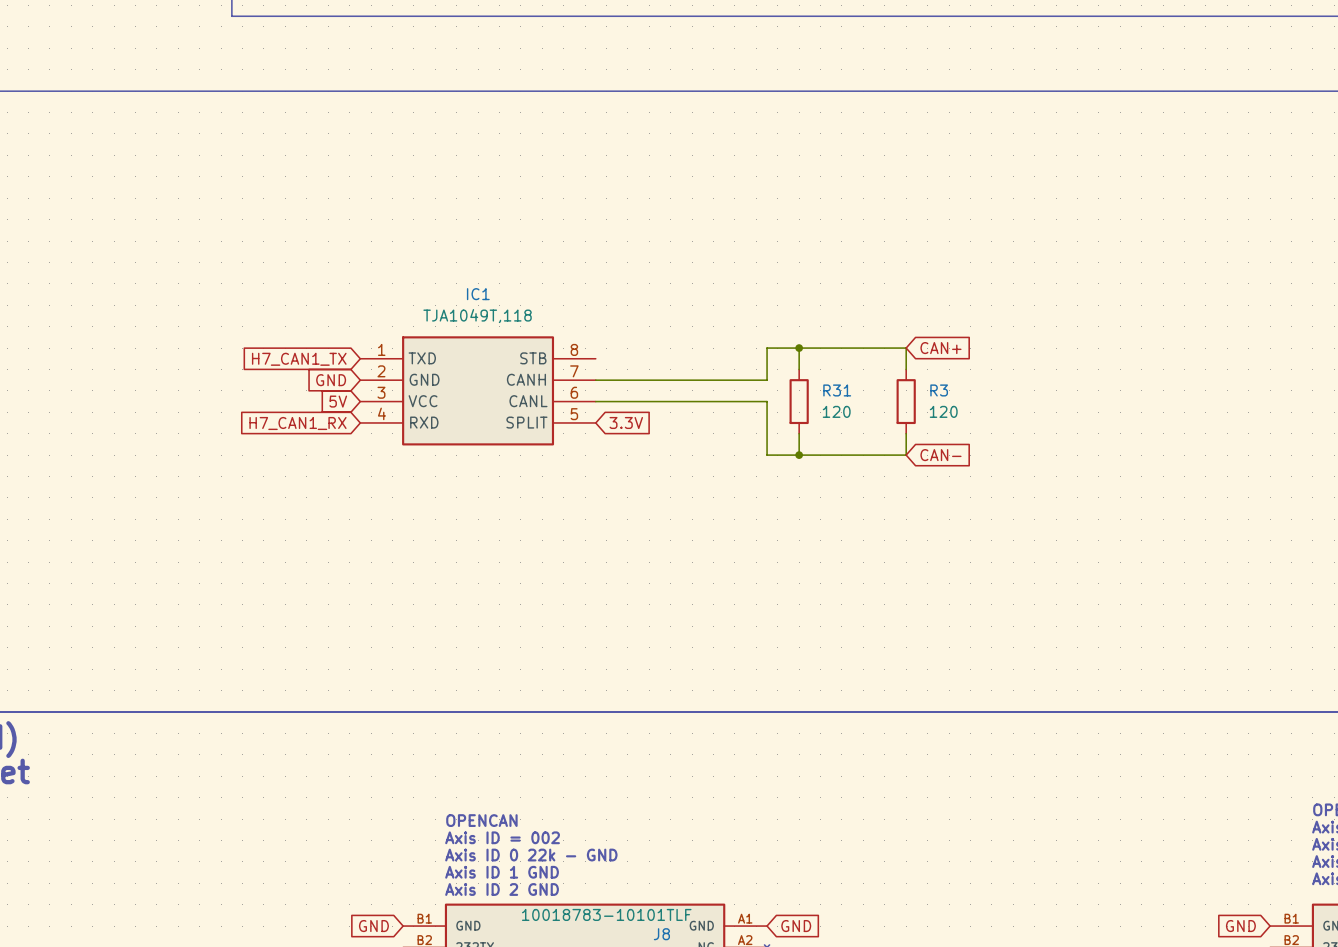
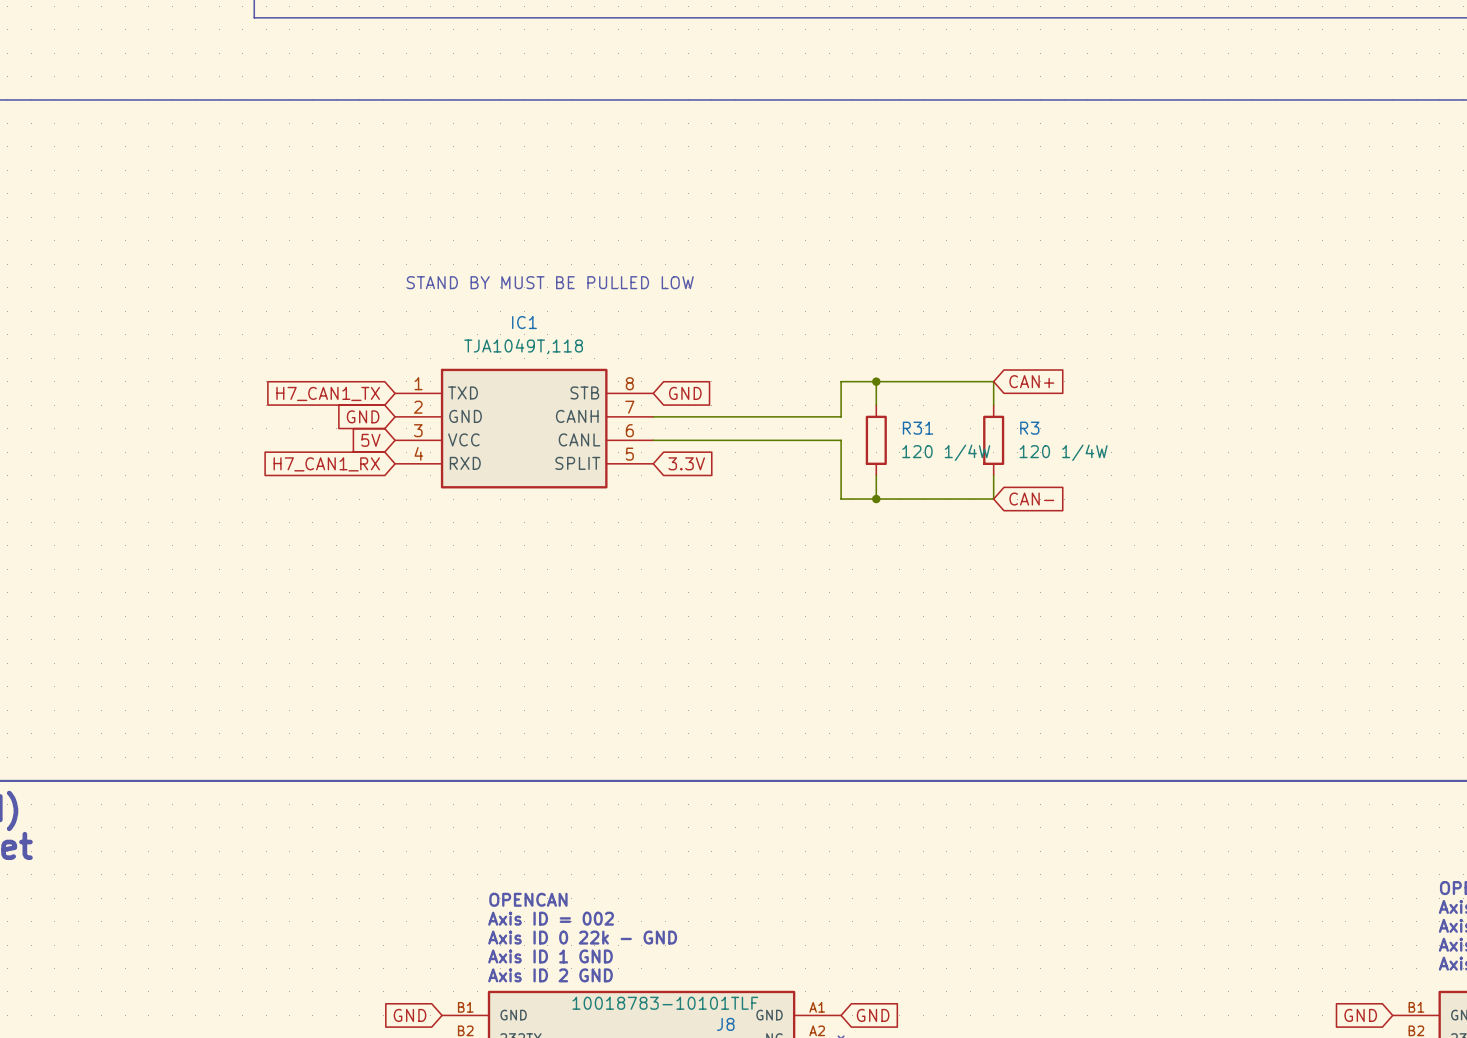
text: none -> STAND BY MUST BE PULLED LOW (550, 282)
global label: none -> GND (685, 393)
R31 value: 120 (836, 411) -> 120 1/4W (946, 452)
R3 value: 120 (943, 411) -> 120 1/4W (1063, 452)

